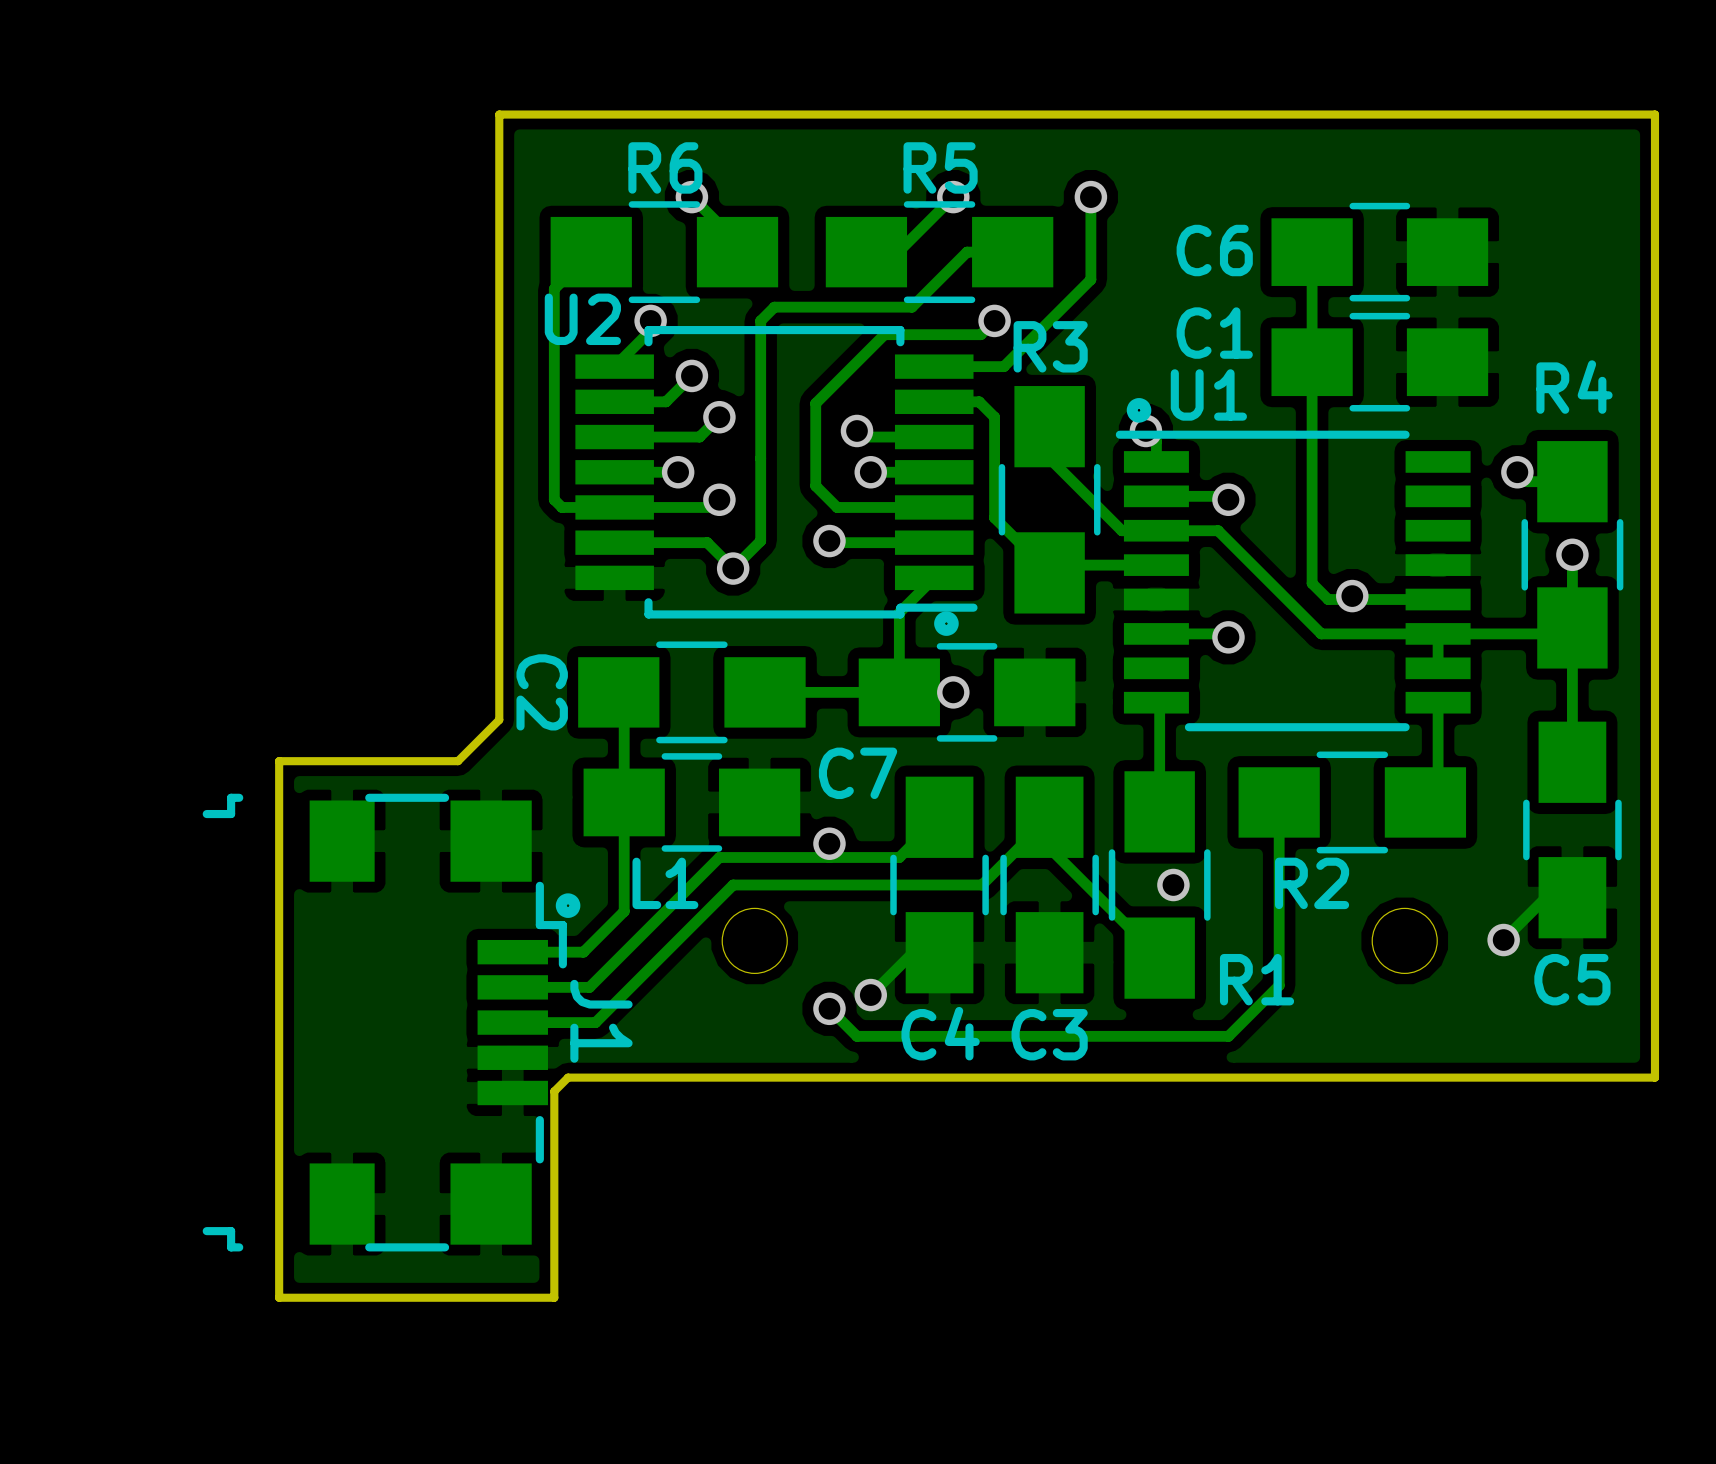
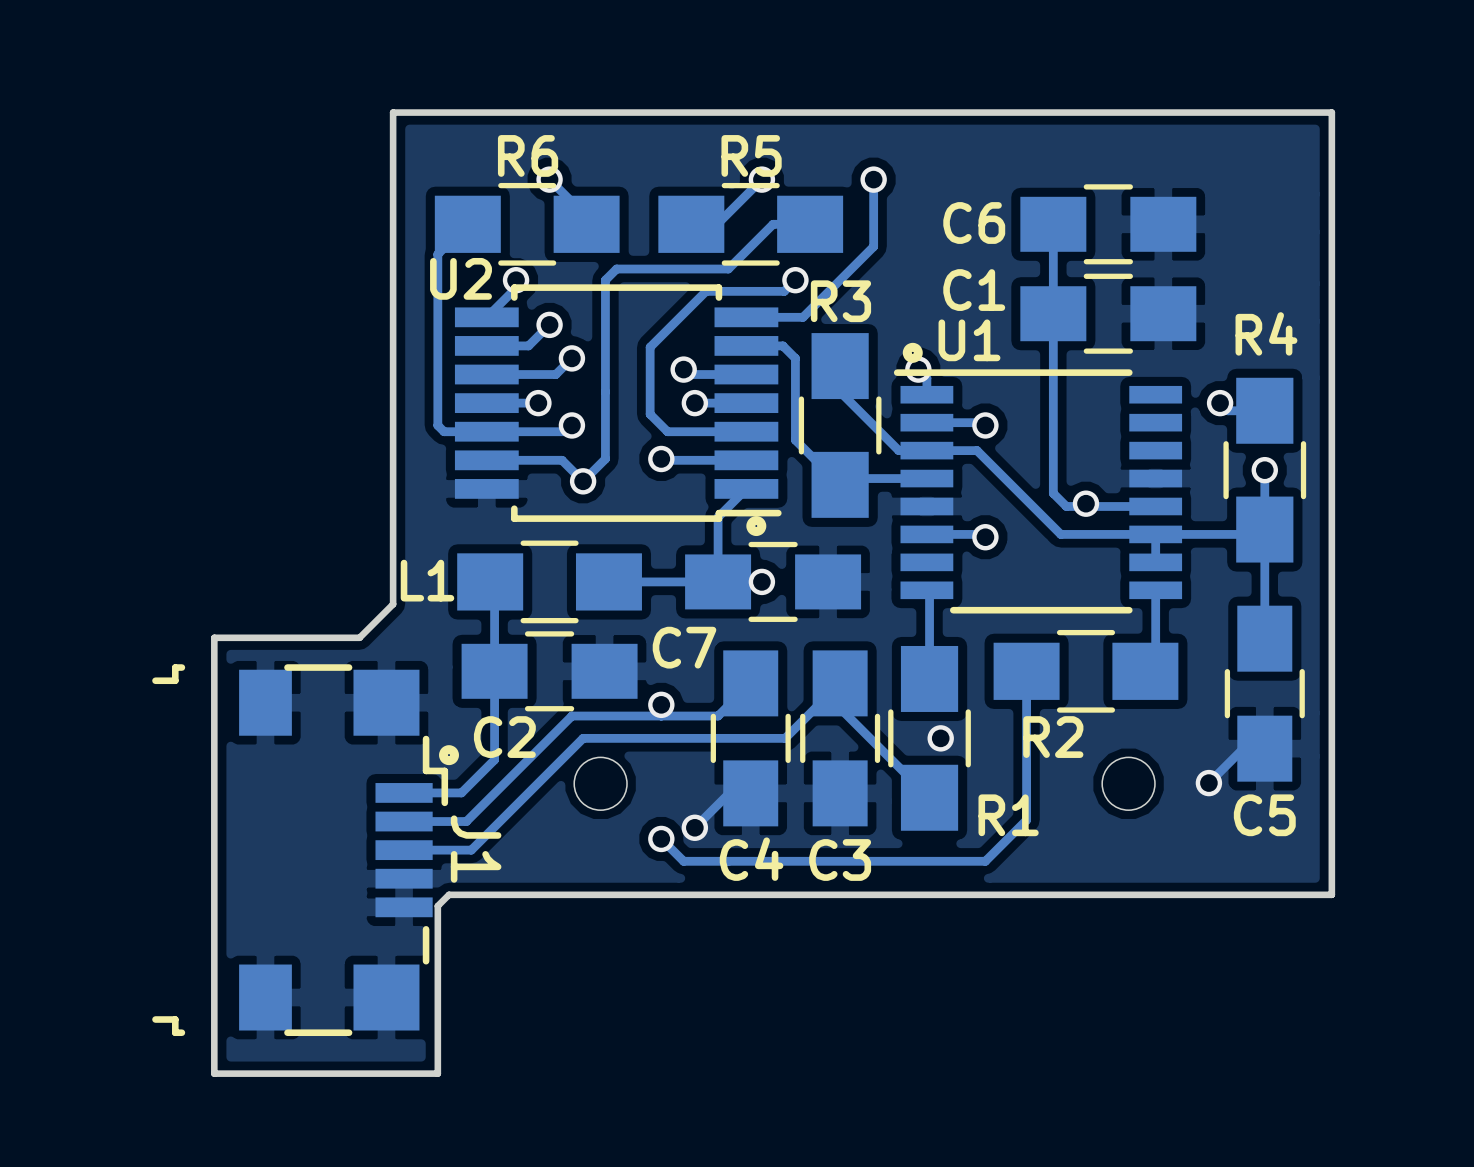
C2 name rotation: 0° (542, 692) -> 90° counterclockwise (504, 737)
C2 name position: C2 (542, 692) -> C2 (504, 737)
L1 name position: L1 (665, 883) -> L1 (427, 580)

